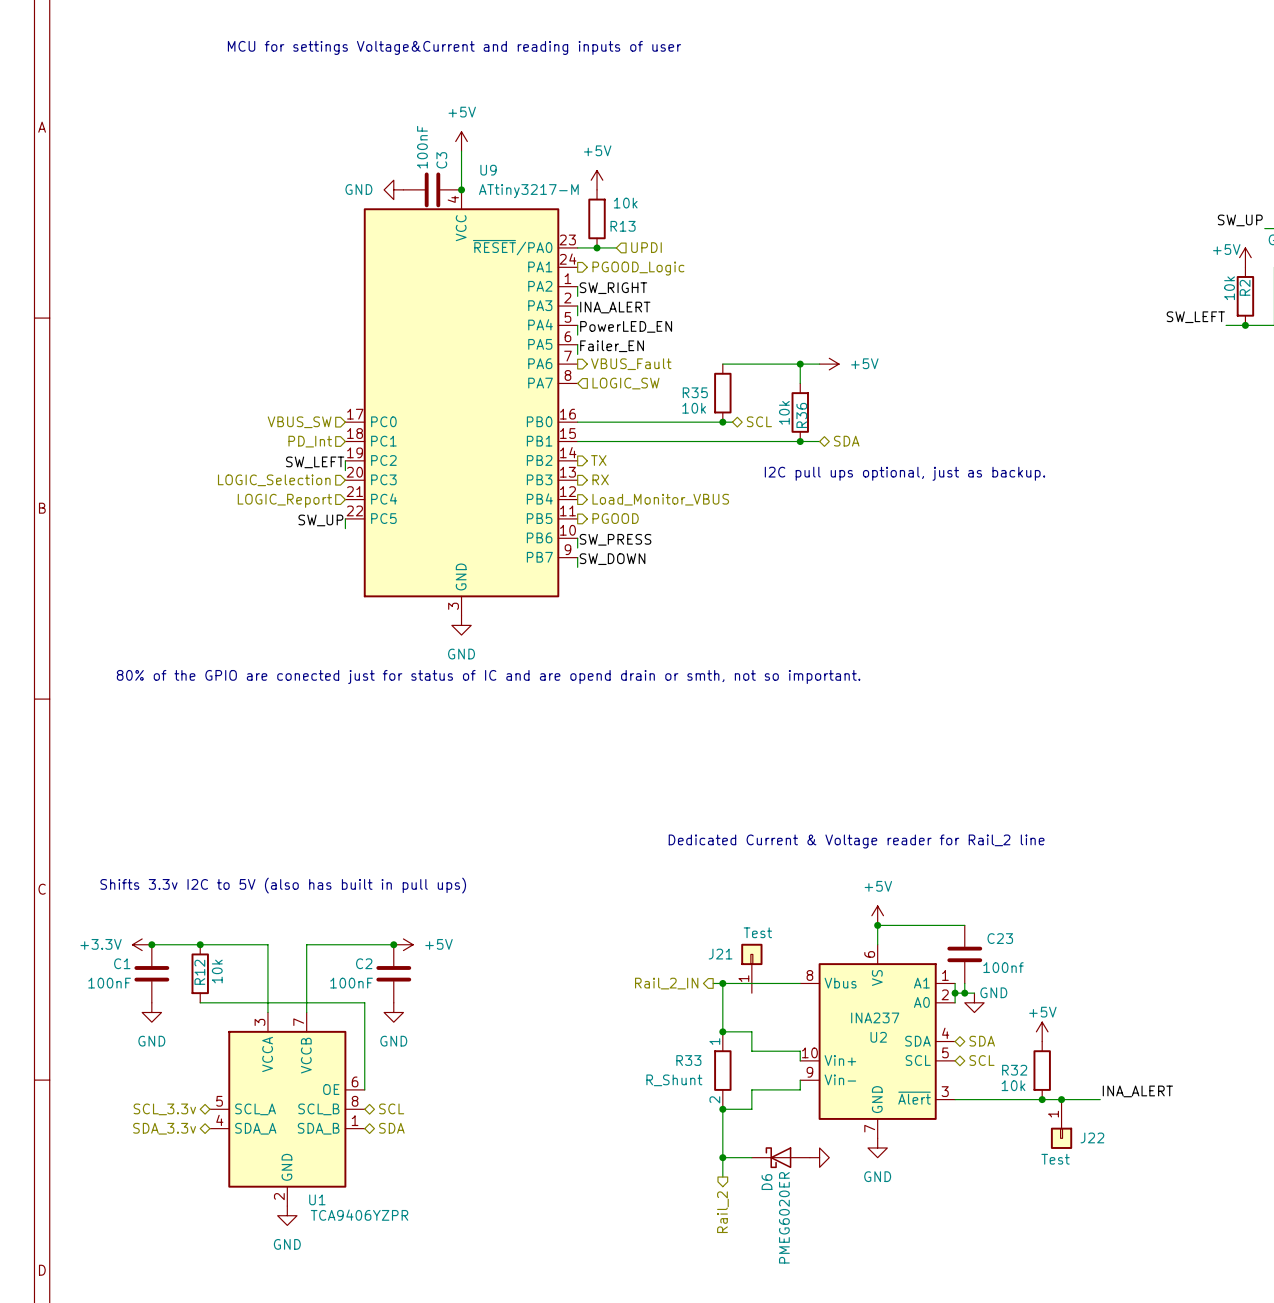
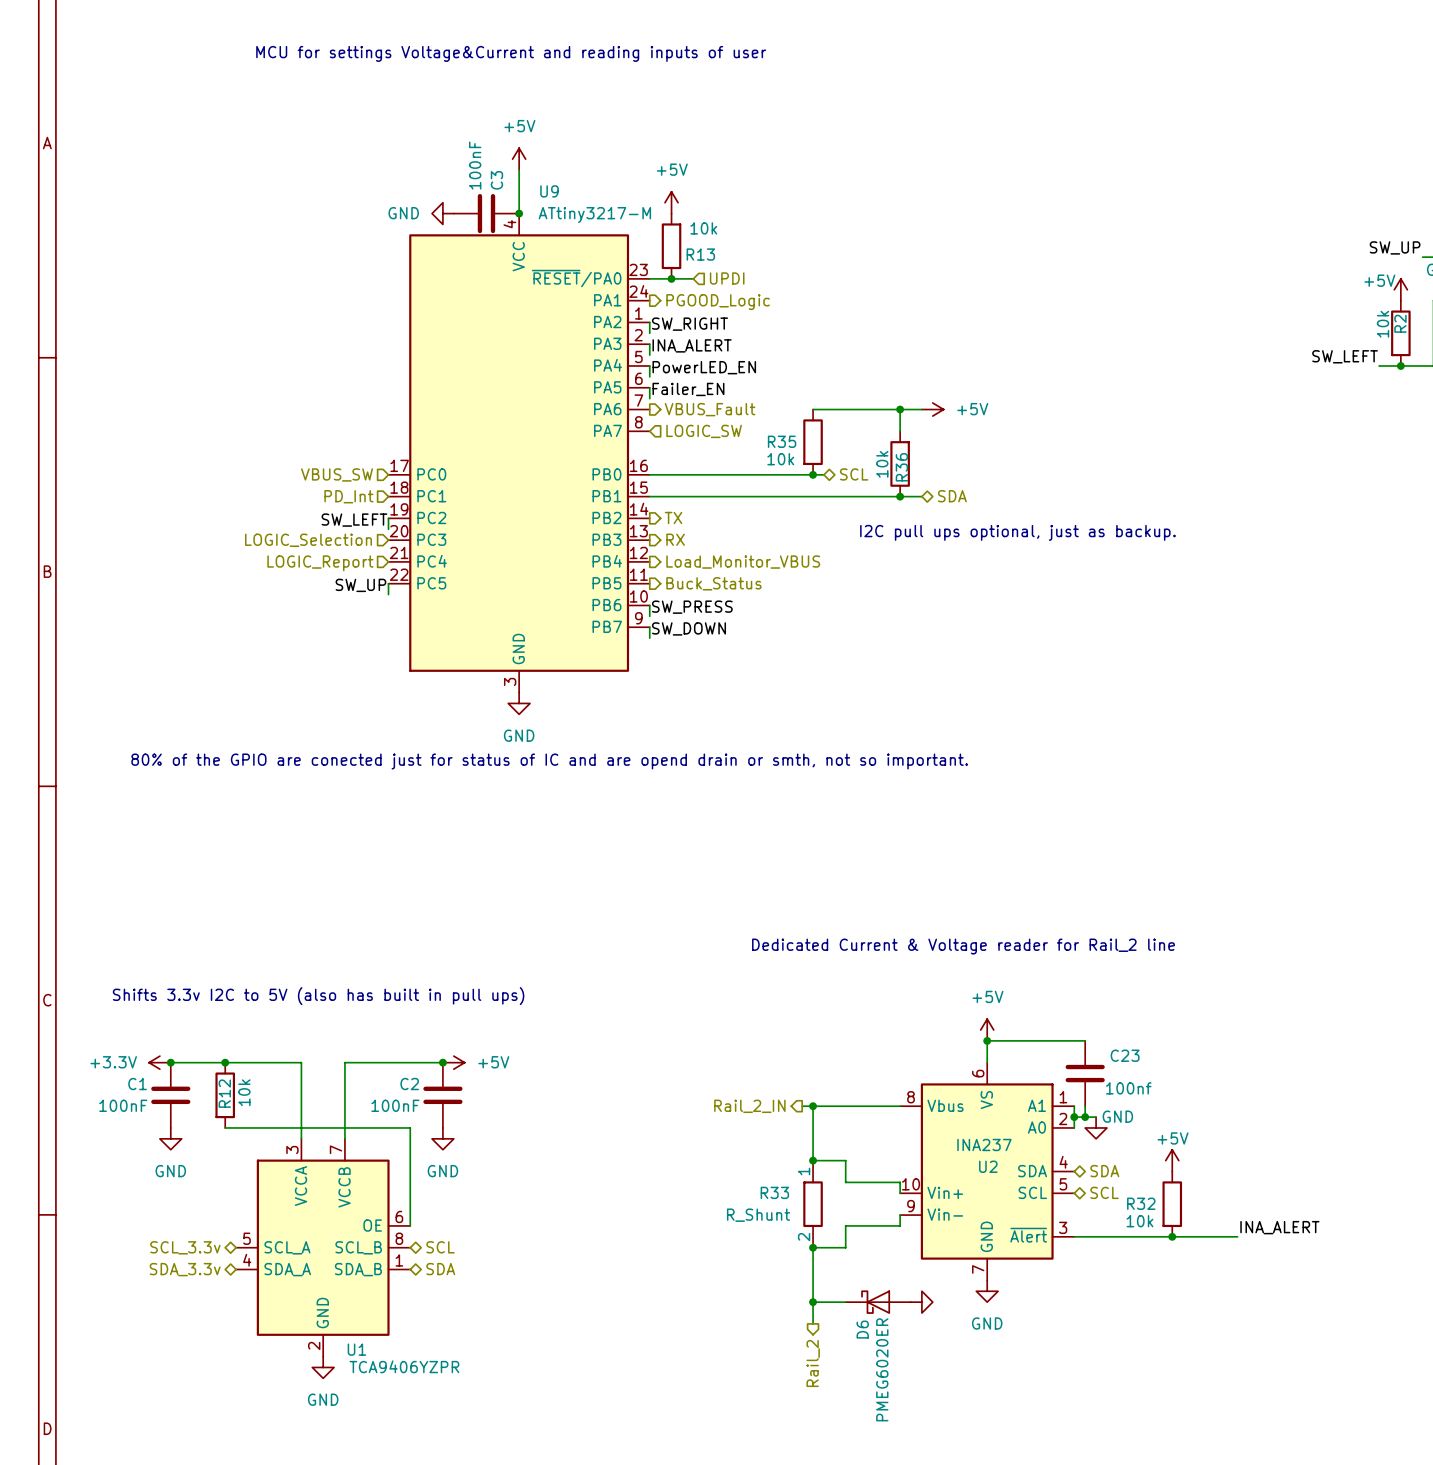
hierarchical label: PGOOD (615, 518) -> Buck_Status (713, 583)
J21: Test (751, 968) -> none
junction: (1061, 1099) -> none
J22: Test (1061, 1124) -> none

